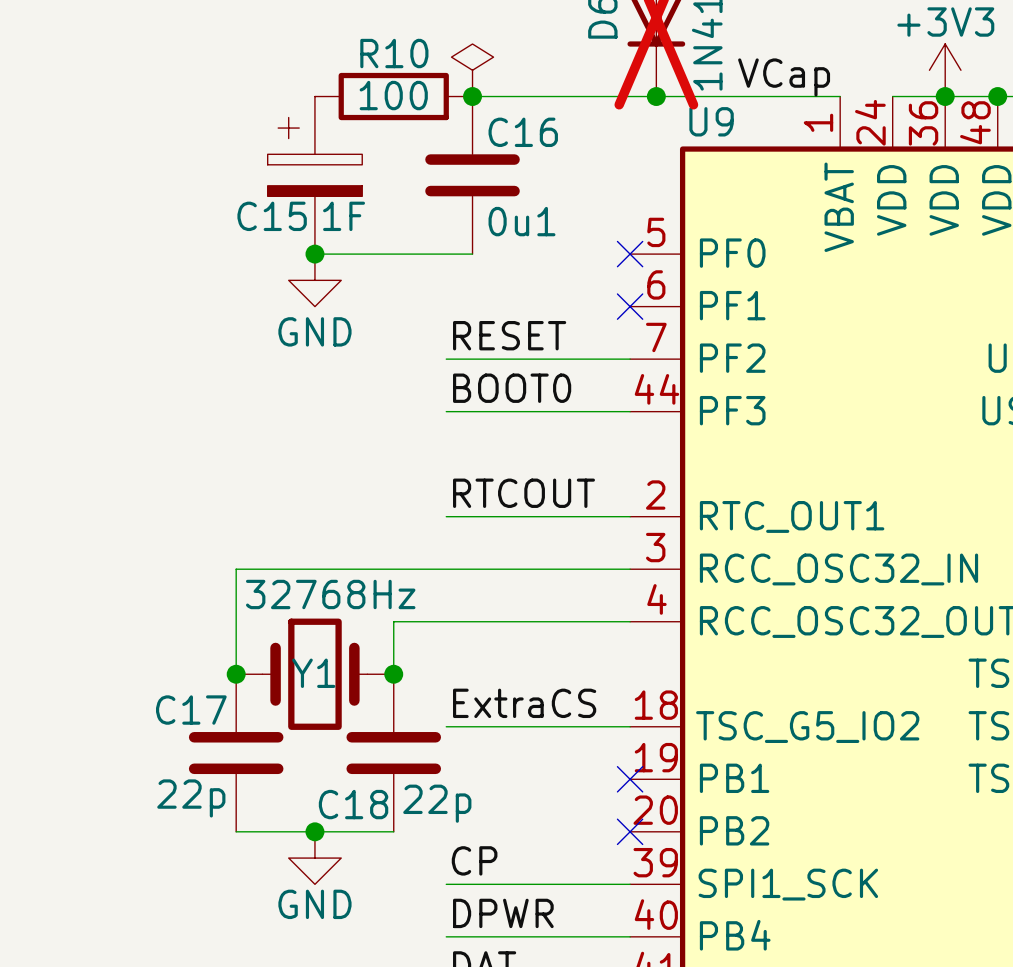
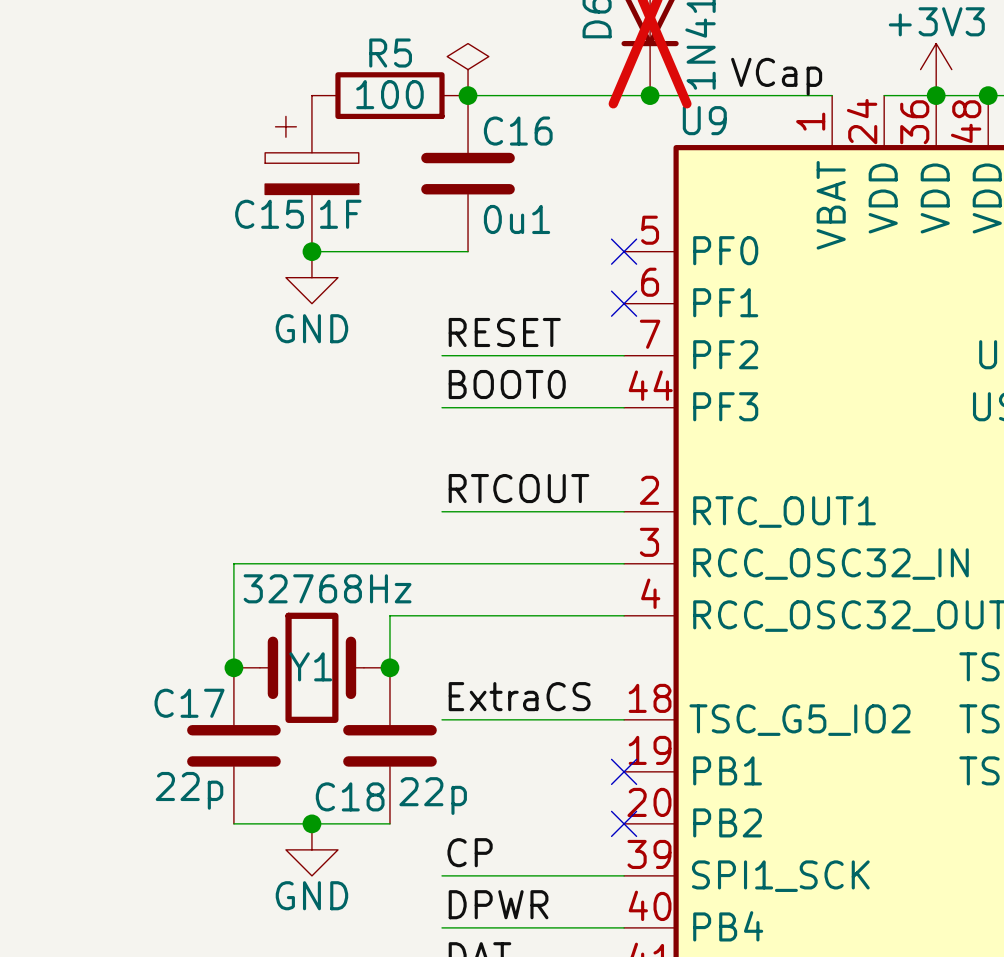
R10 name: R10 (394, 53) -> R5 (390, 53)

